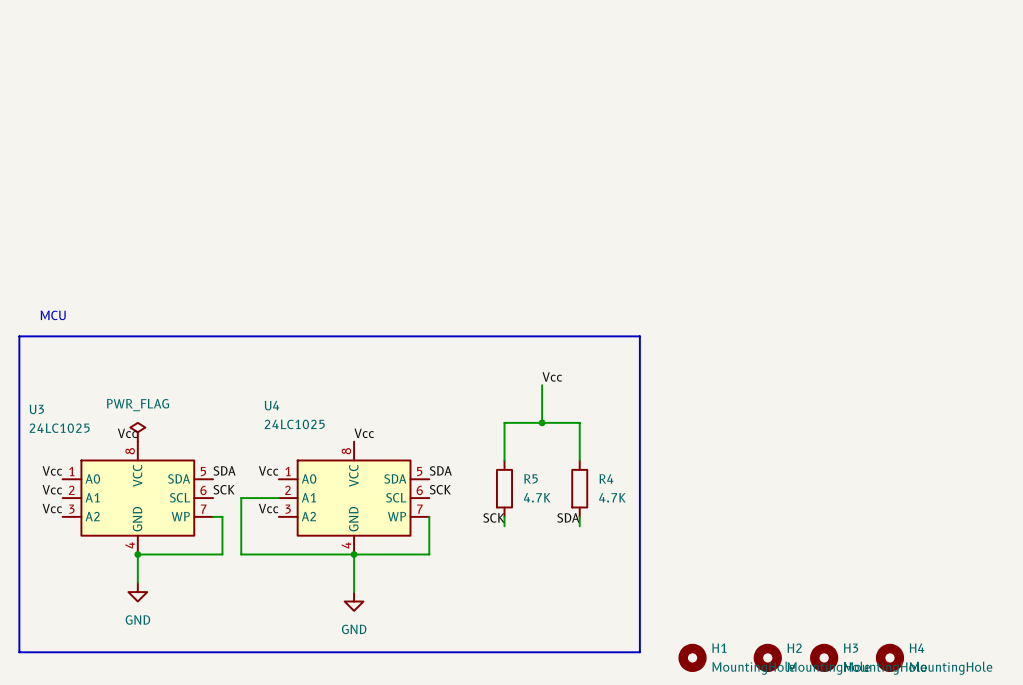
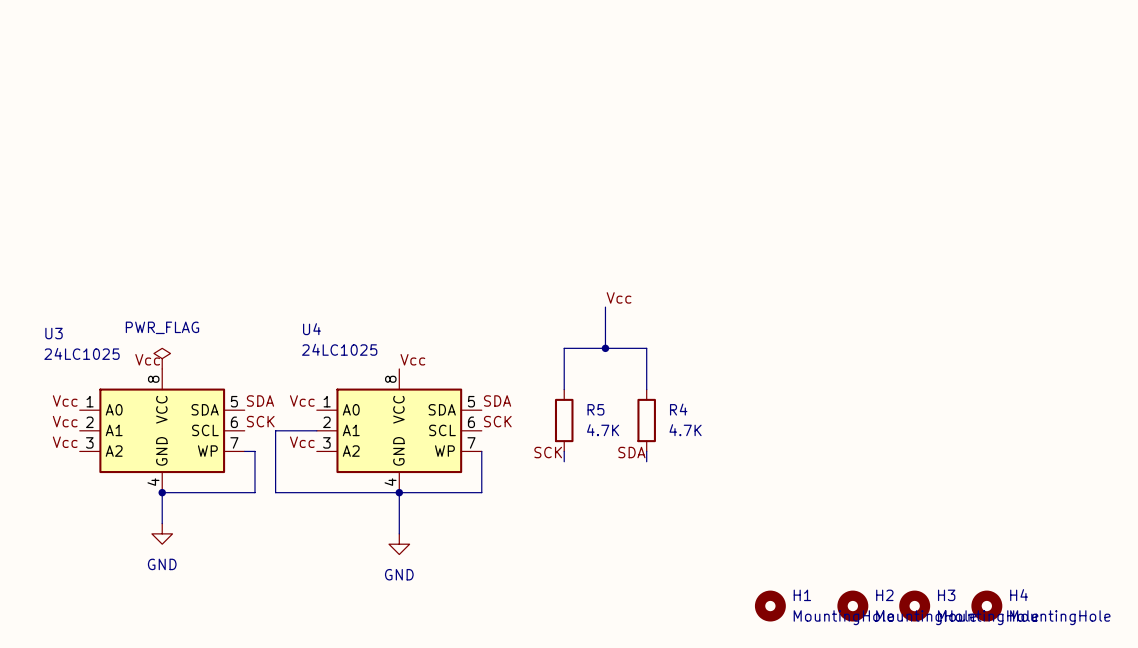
text: MCU (53, 315) -> none
line: (19, 336) (639, 336) (639, 652) (19, 652) (19, 336) -> none

